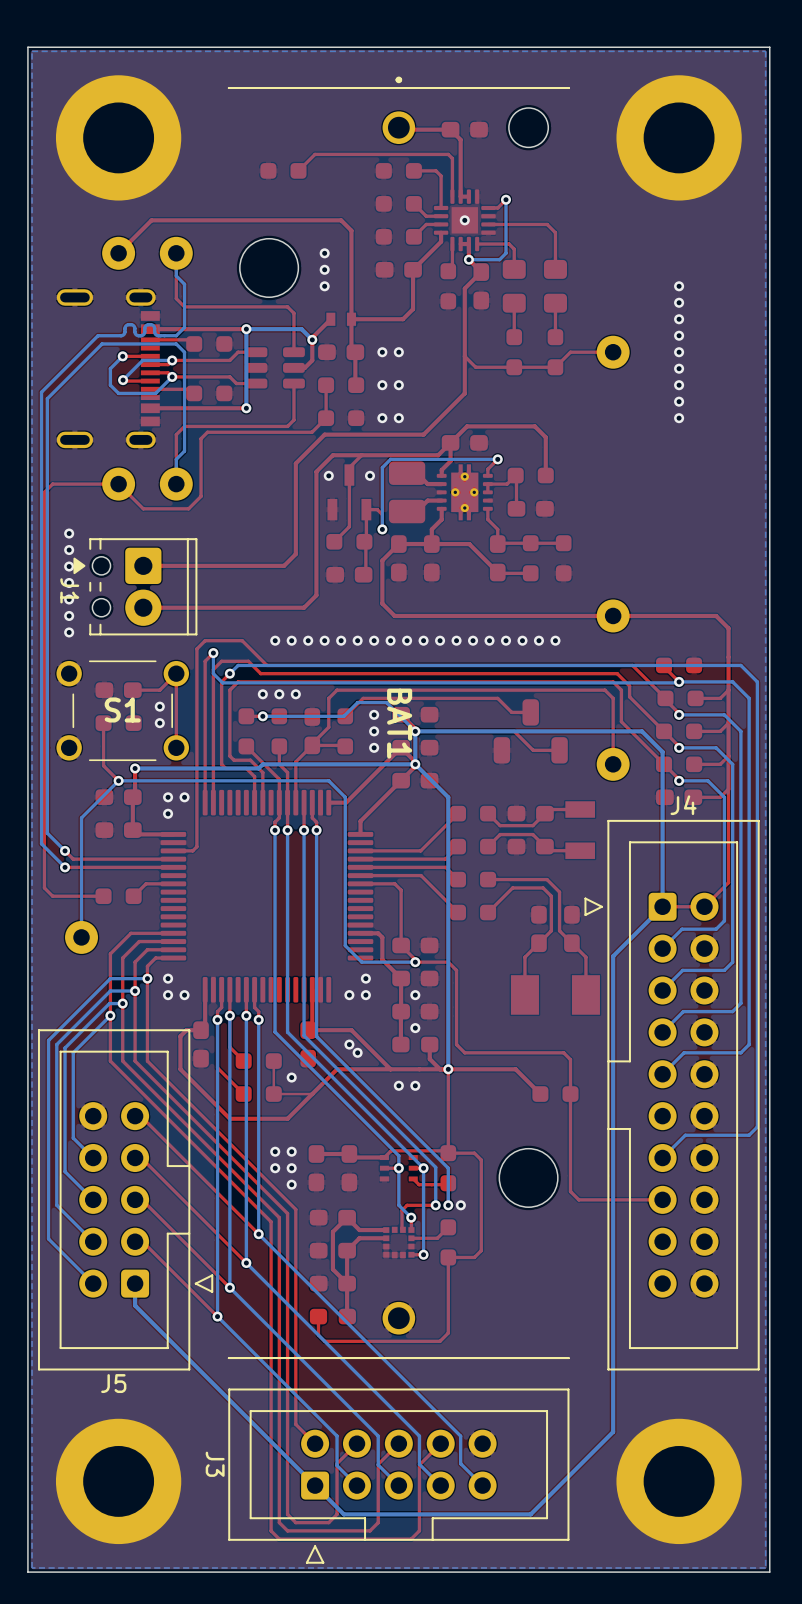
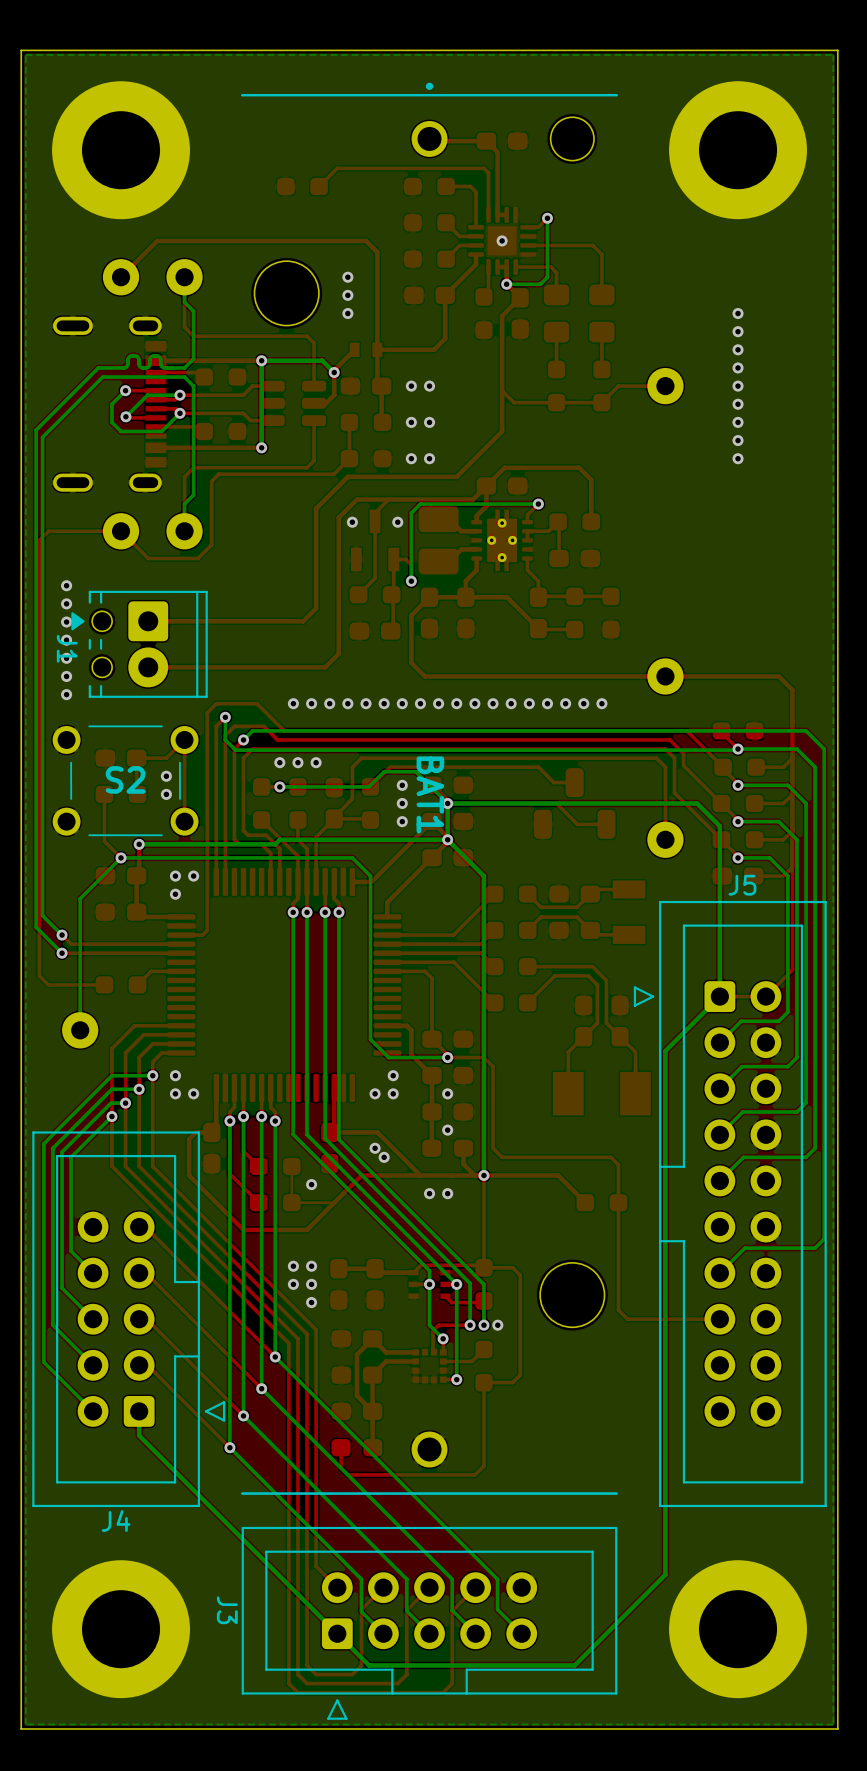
S1 name: S1 (122, 709) -> S2 (125, 779)
J4 name: J4 (683, 805) -> J5 (742, 885)
J5 name: J5 (113, 1383) -> J4 (116, 1521)

